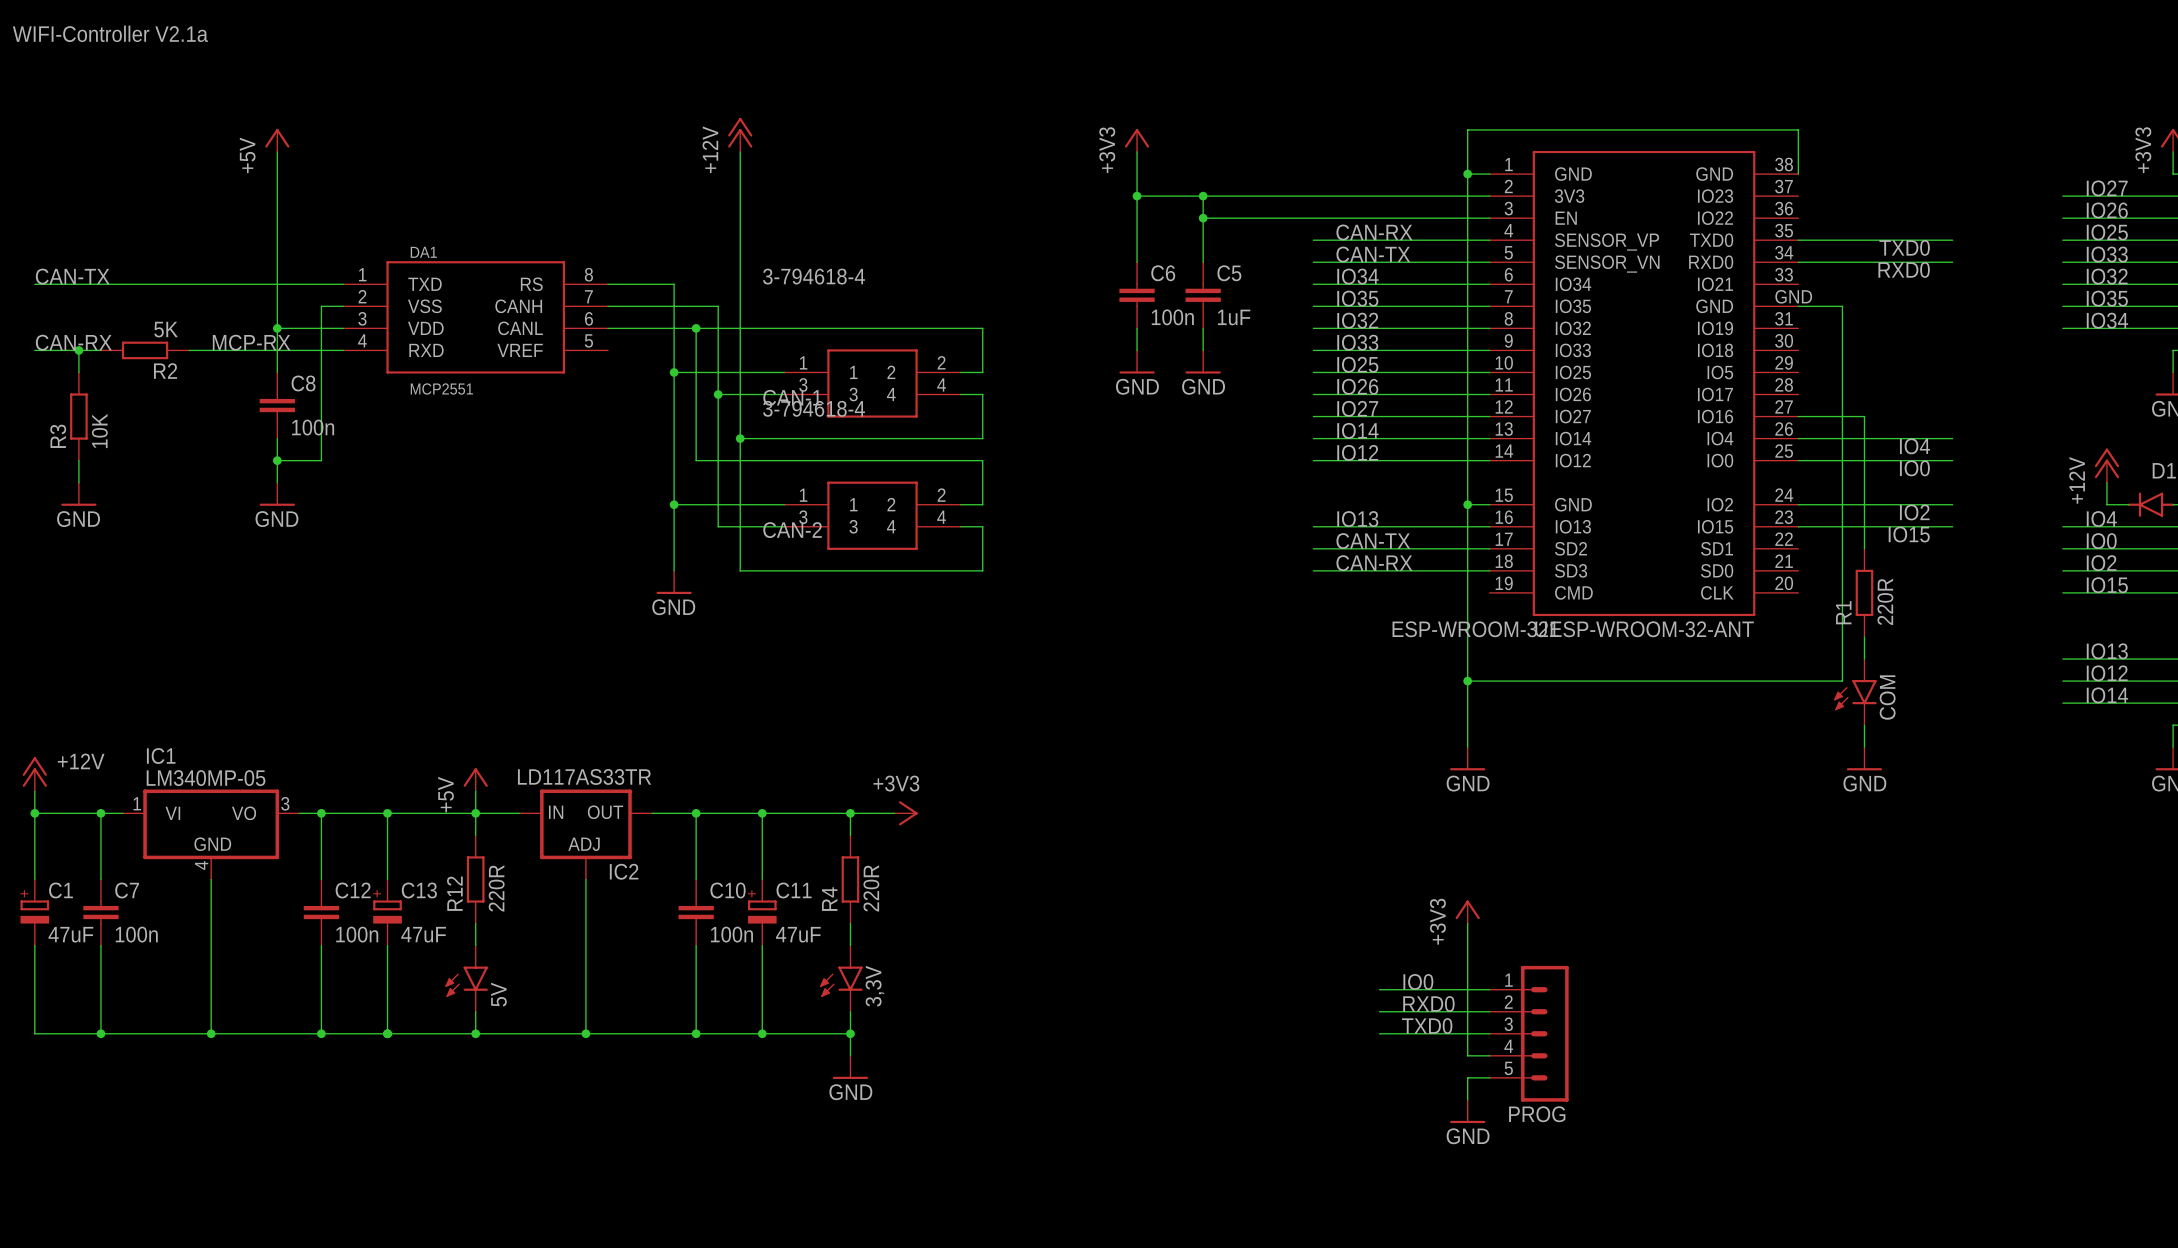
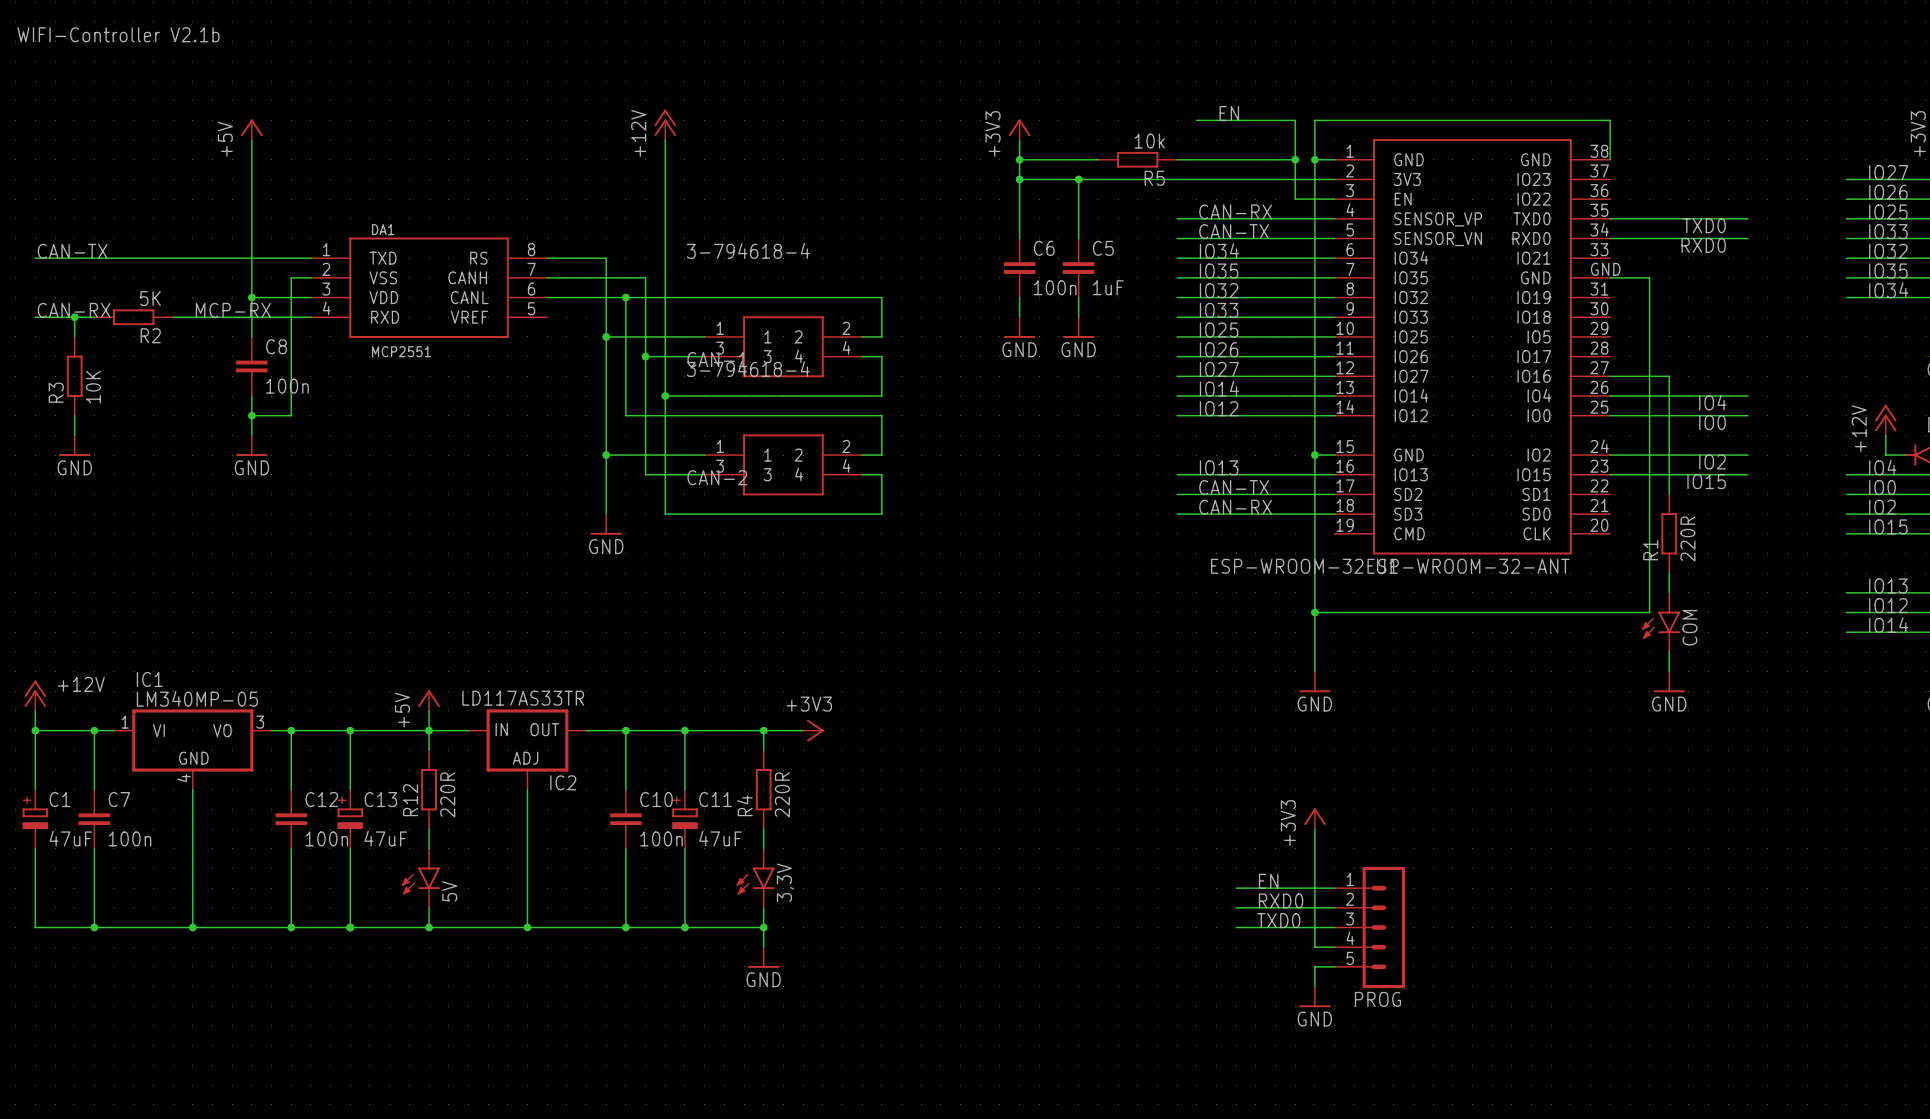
text: WIFI-Controller V2.1a (110, 33) -> WIFI-Controller V2.1b (118, 34)
label: none -> EN (1229, 113)
wire: none -> (1019, 159) (1098, 159)
junction: none -> (1019, 159)
R5: none -> 10k (1137, 159)
wire: none -> (1177, 159) (1295, 159)
junction: none -> (1295, 159)
wire: (1203, 218) (1445, 218) -> (1196, 120) (1295, 120) (1295, 199)
junction: (1203, 218) -> none
label: IO0 (1418, 981) -> EN (1268, 881)

